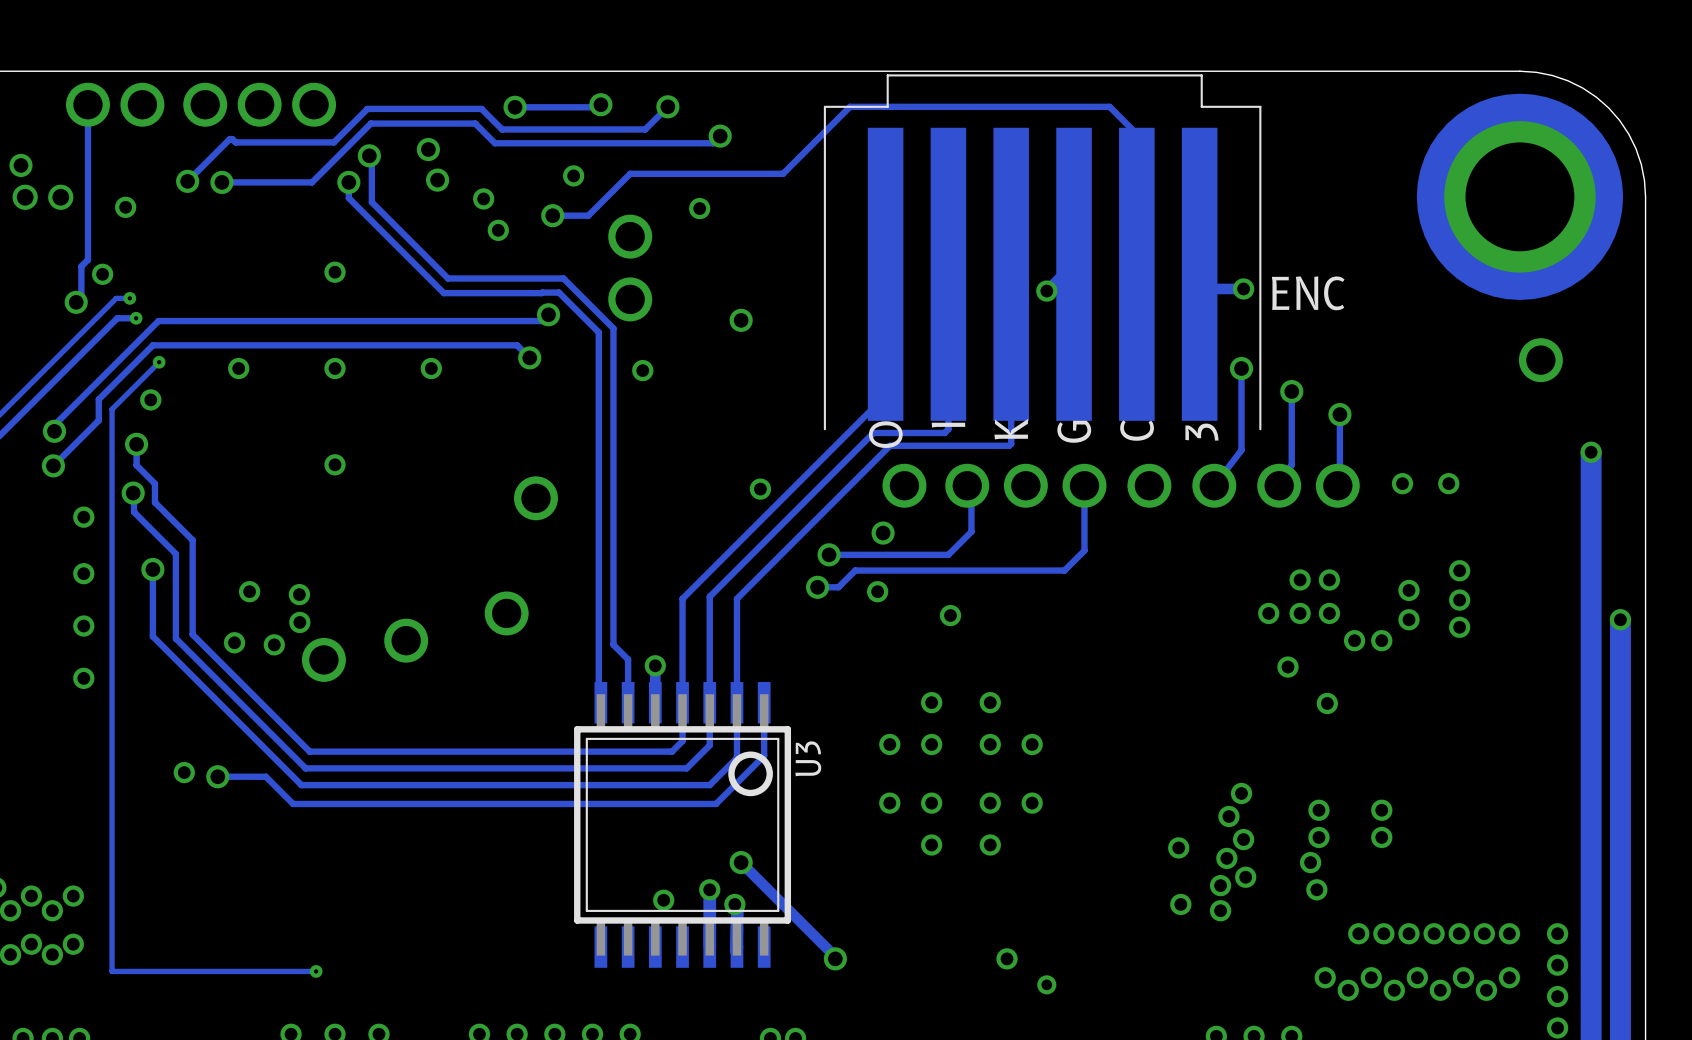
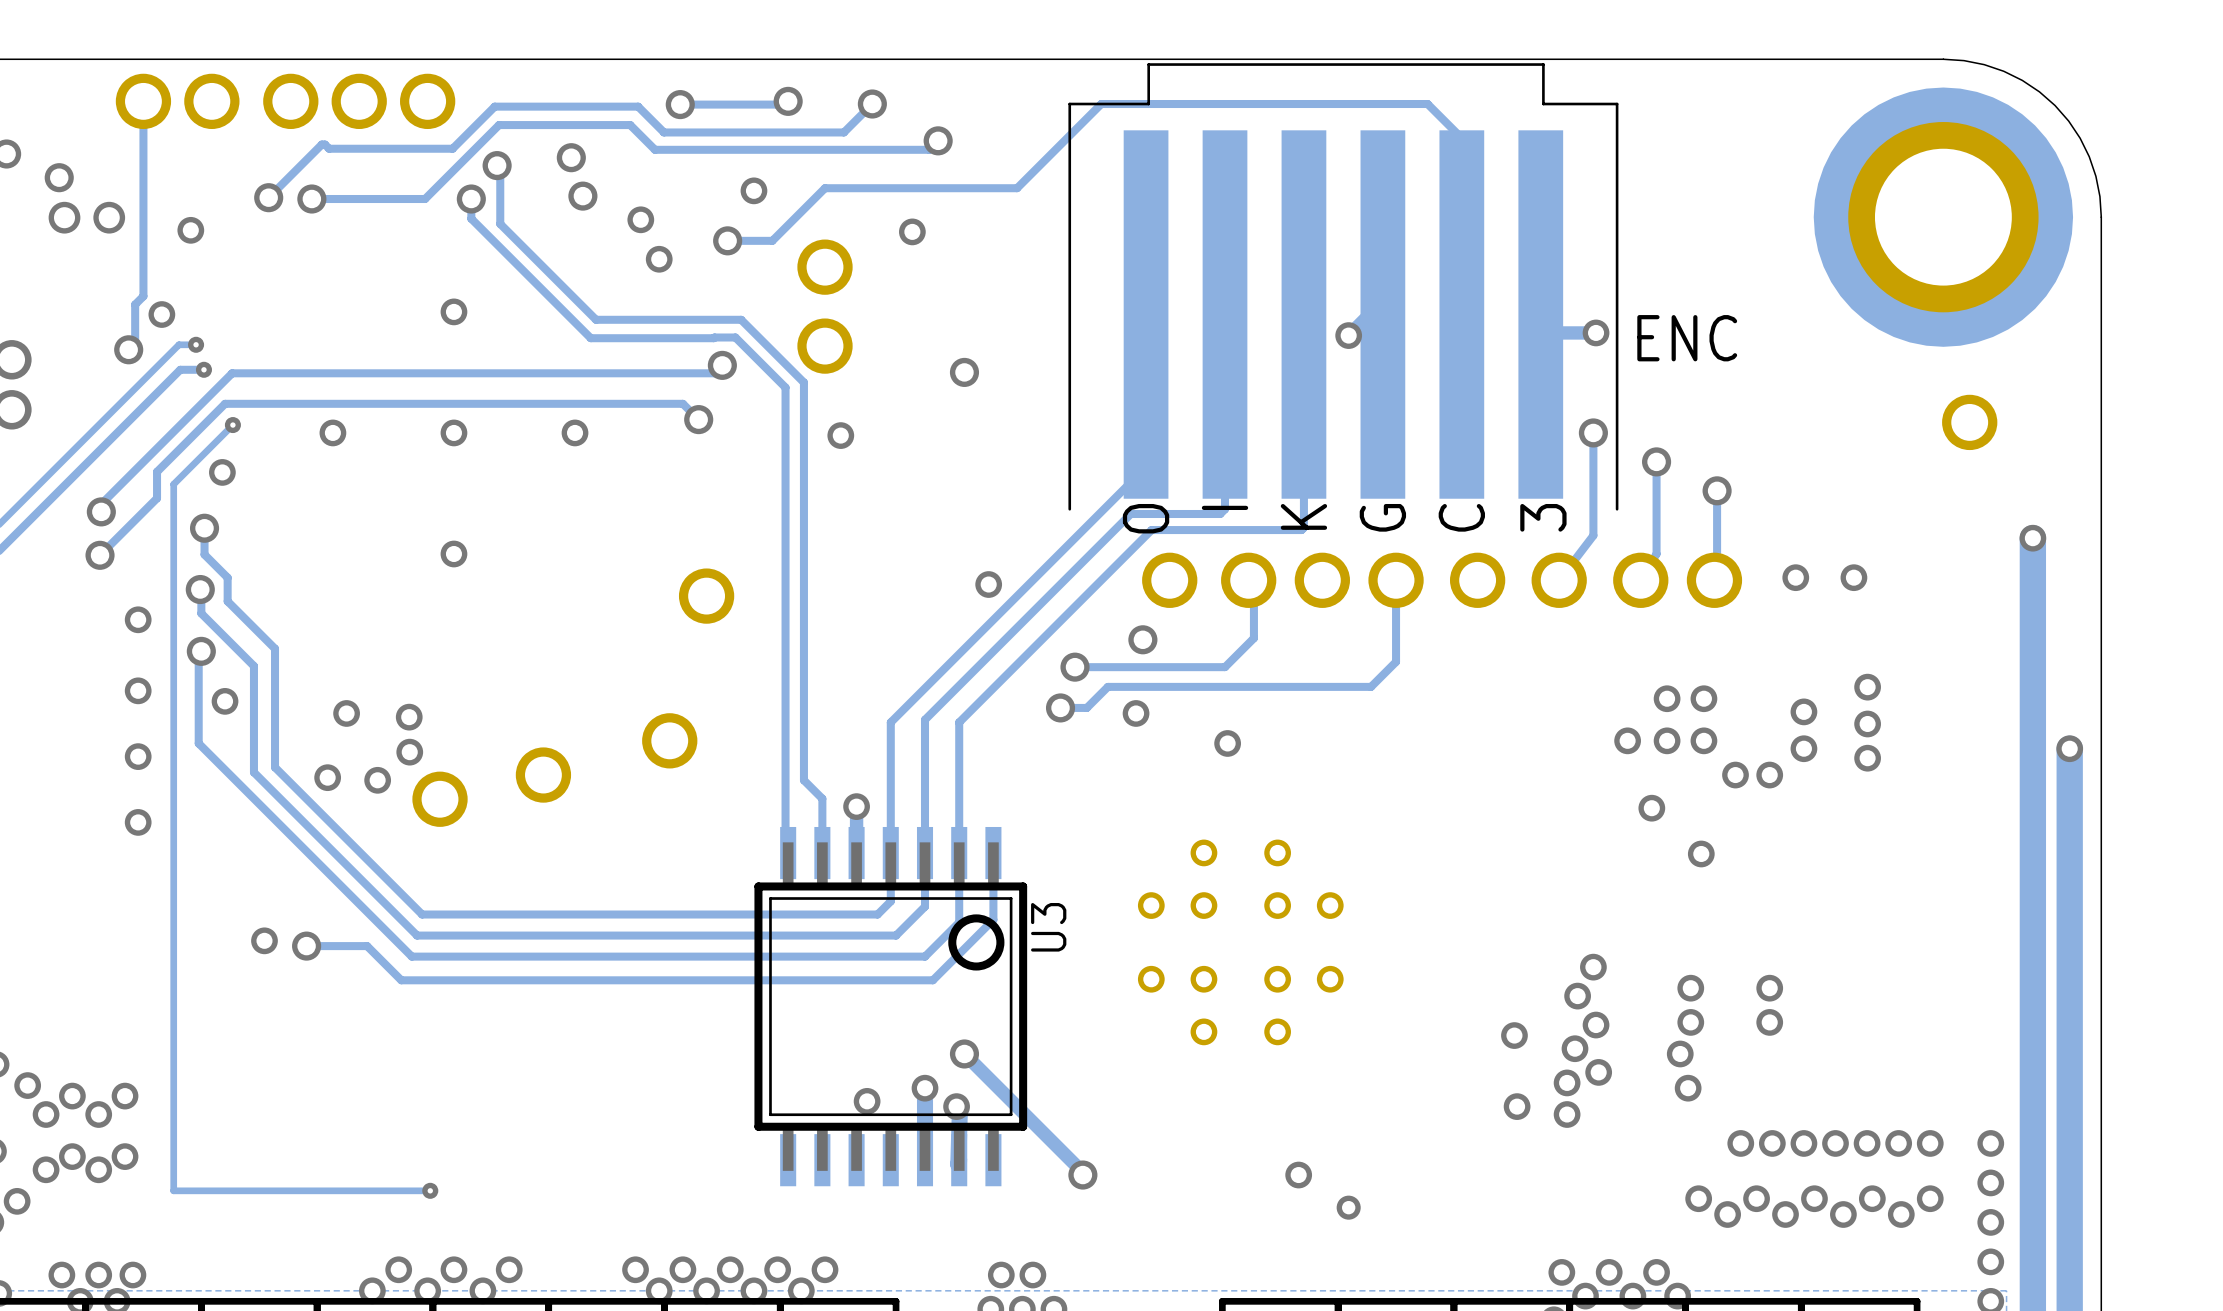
track: (152, 569) (152, 636) -> (201, 651) (198, 653) (198, 743) (225, 769)
via position: (152, 569) -> (201, 651)
via: none -> (225, 701)

